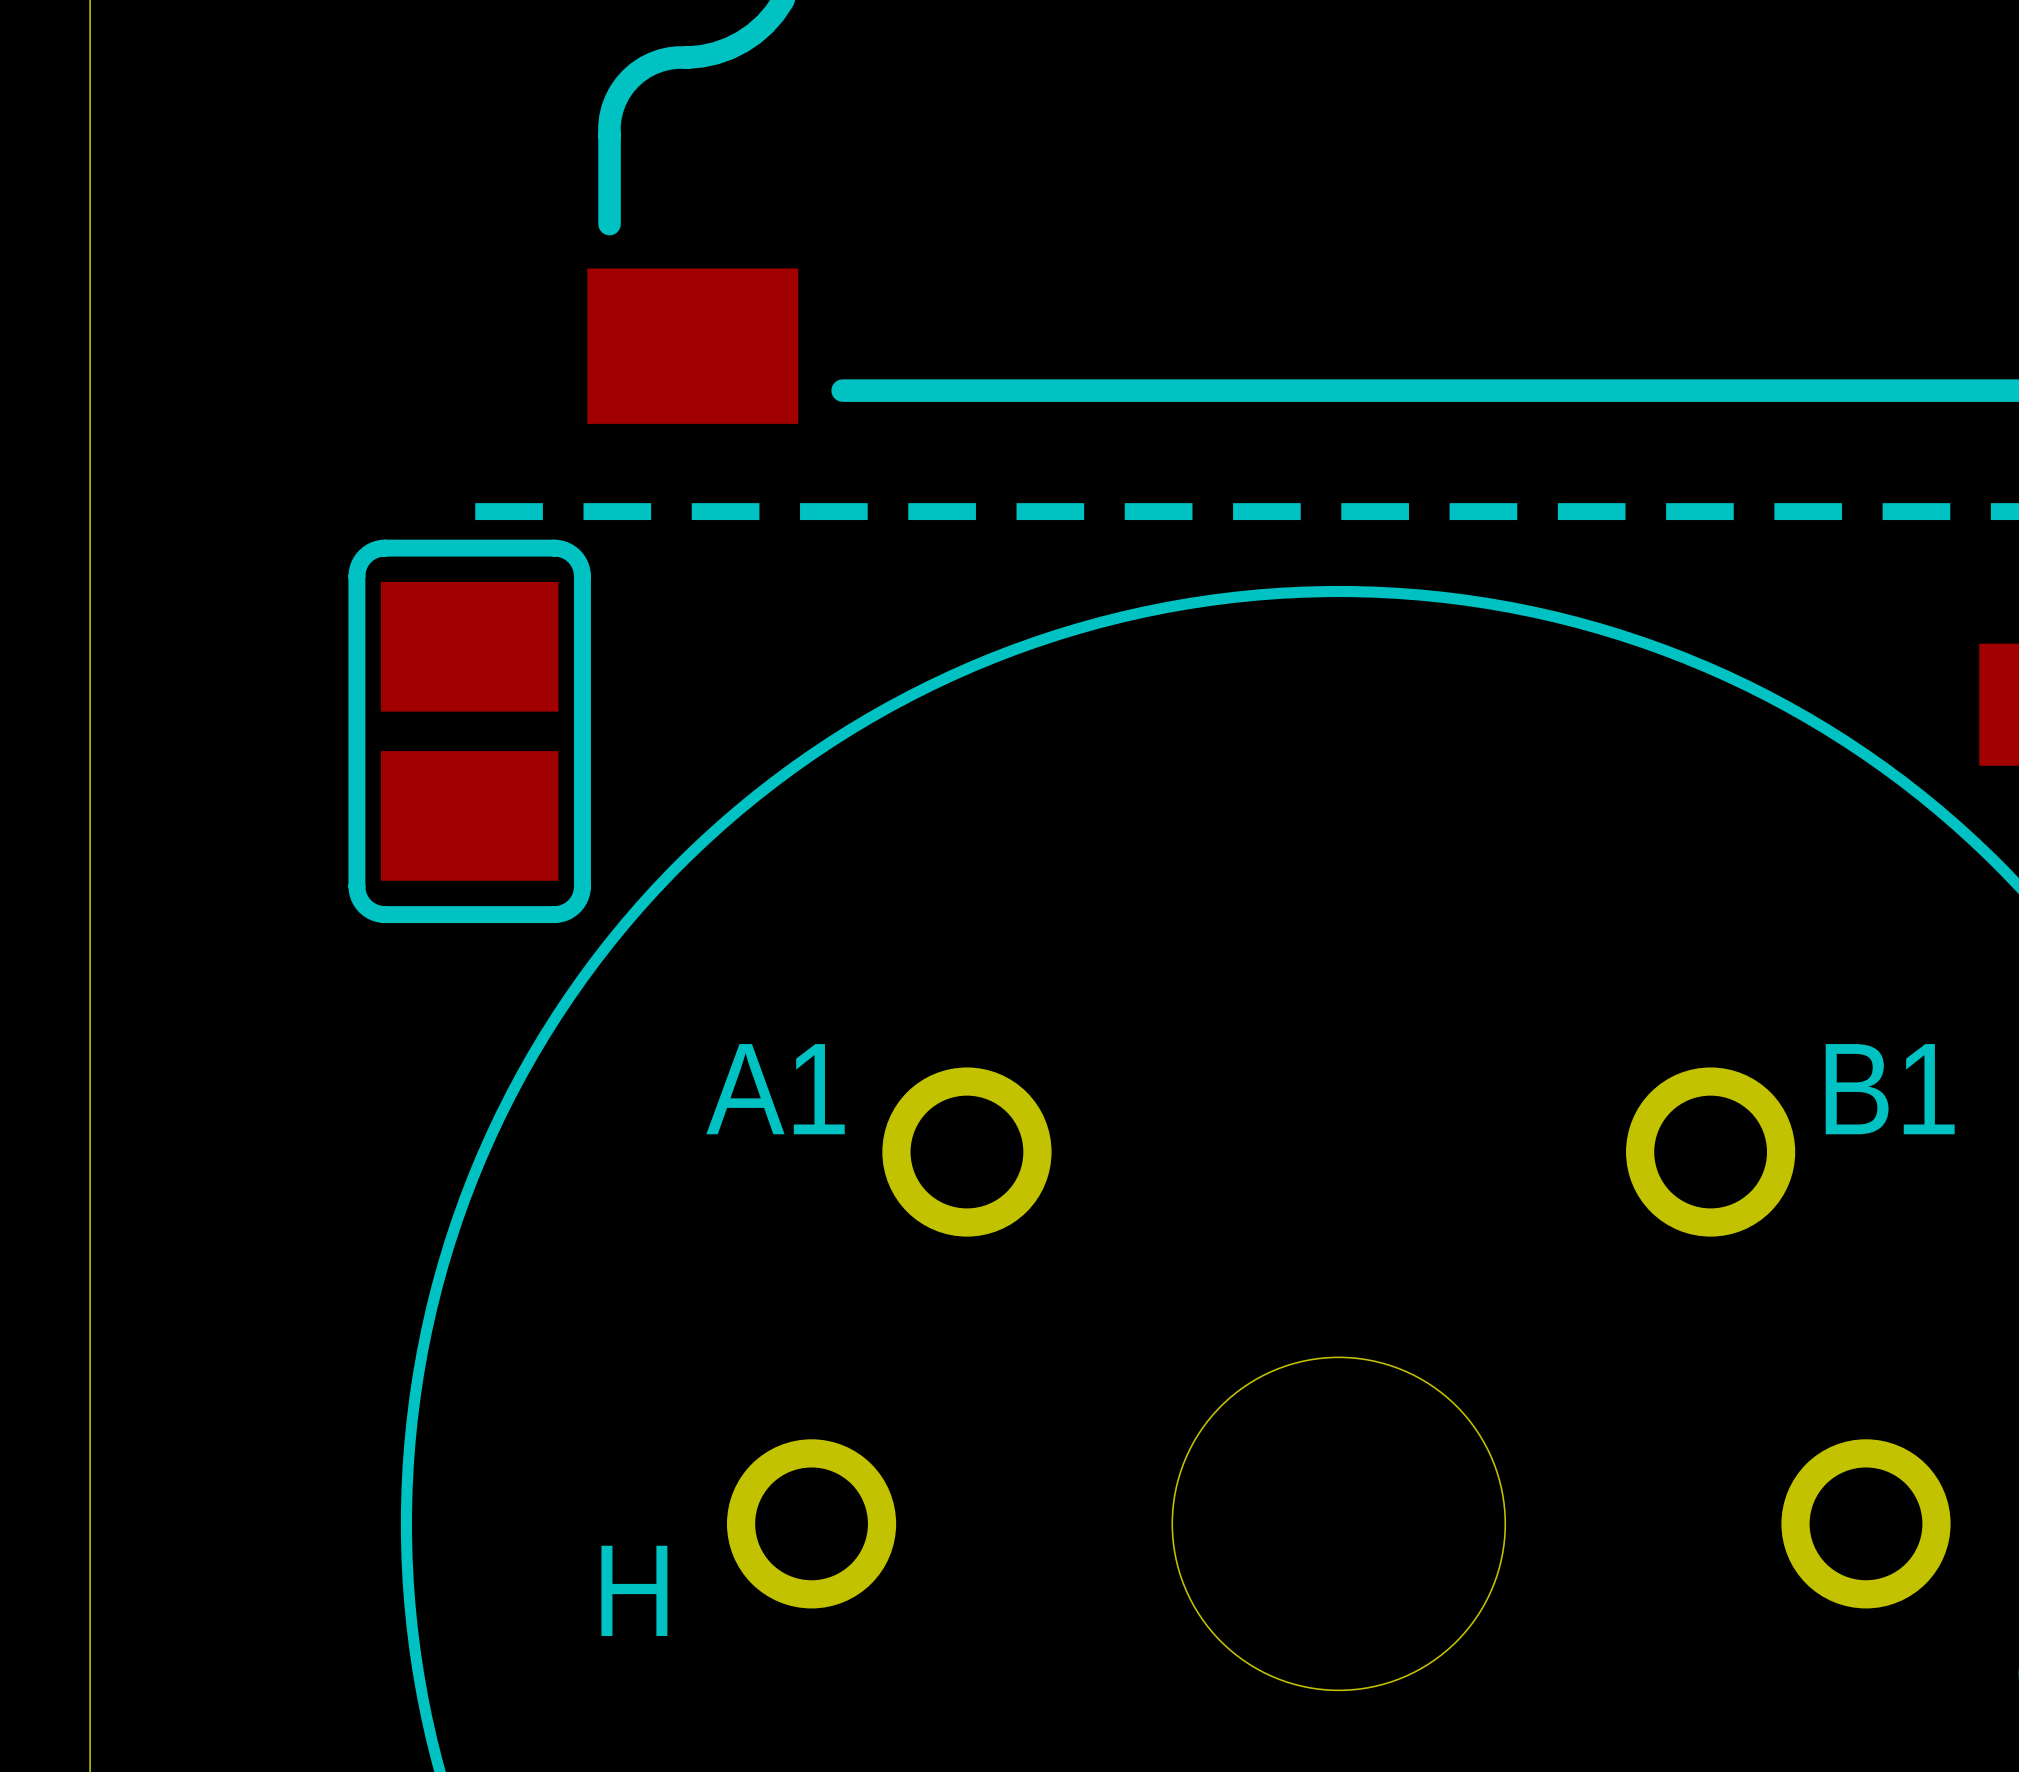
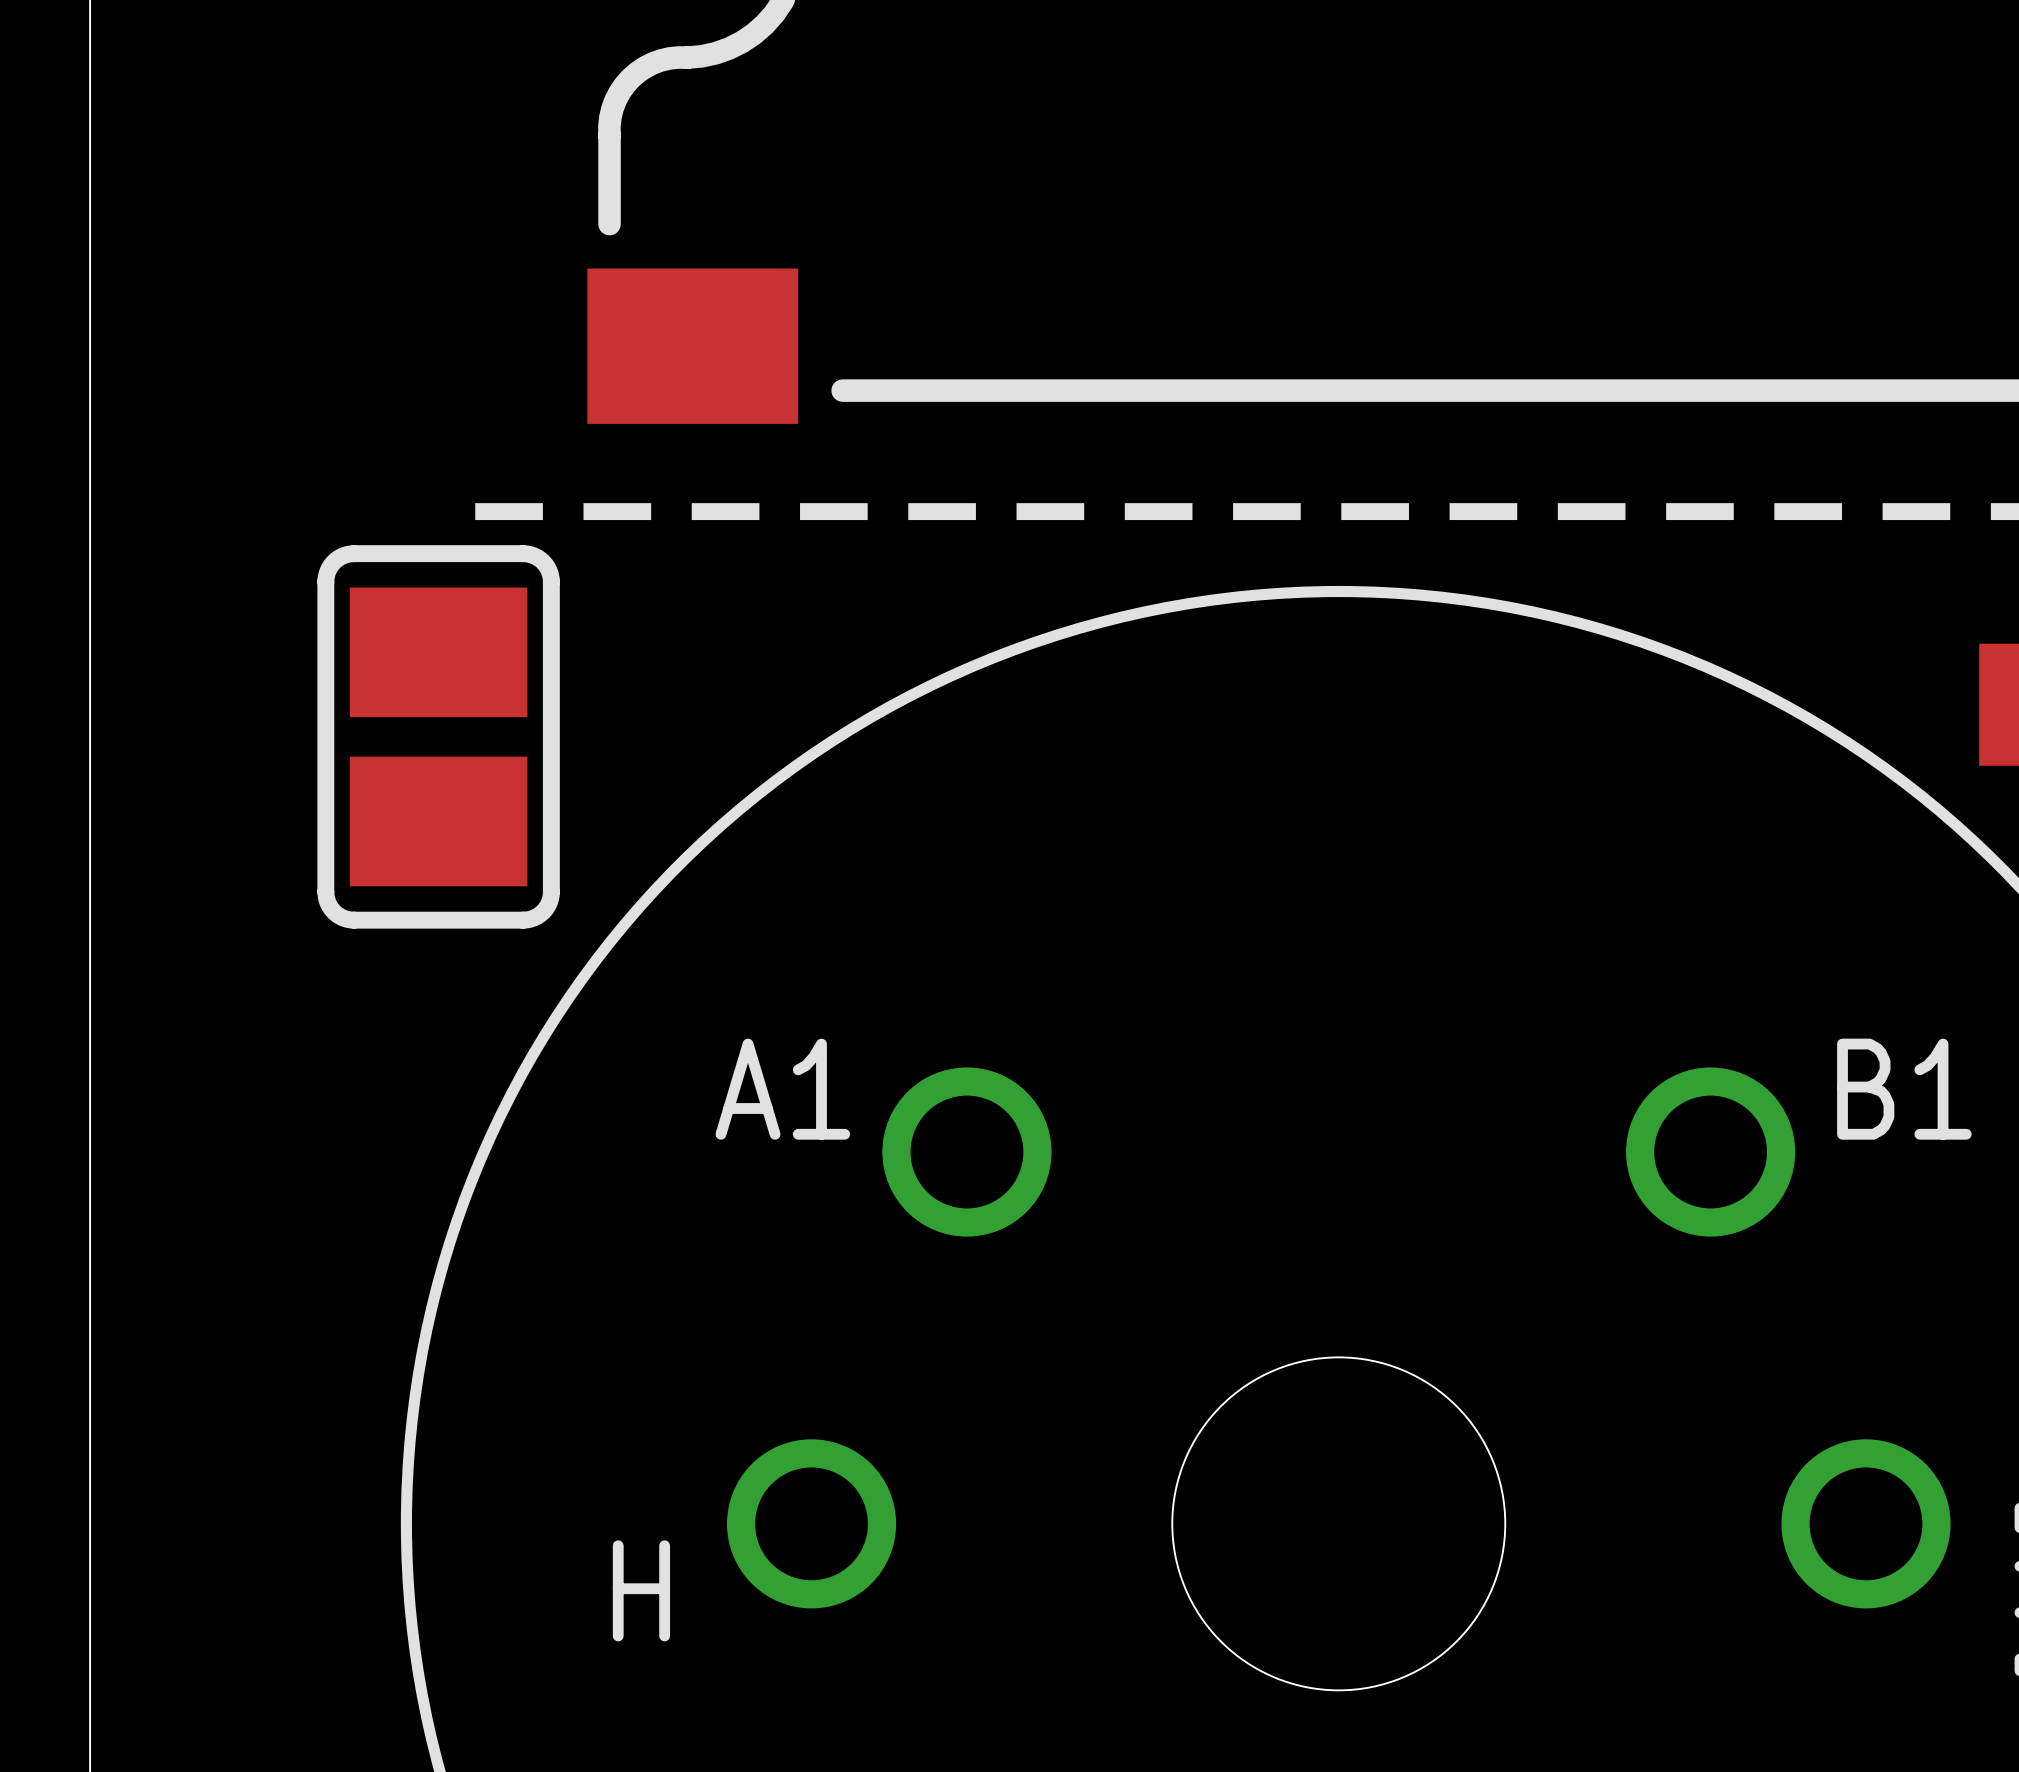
part position: (469, 731) -> (438, 736)

